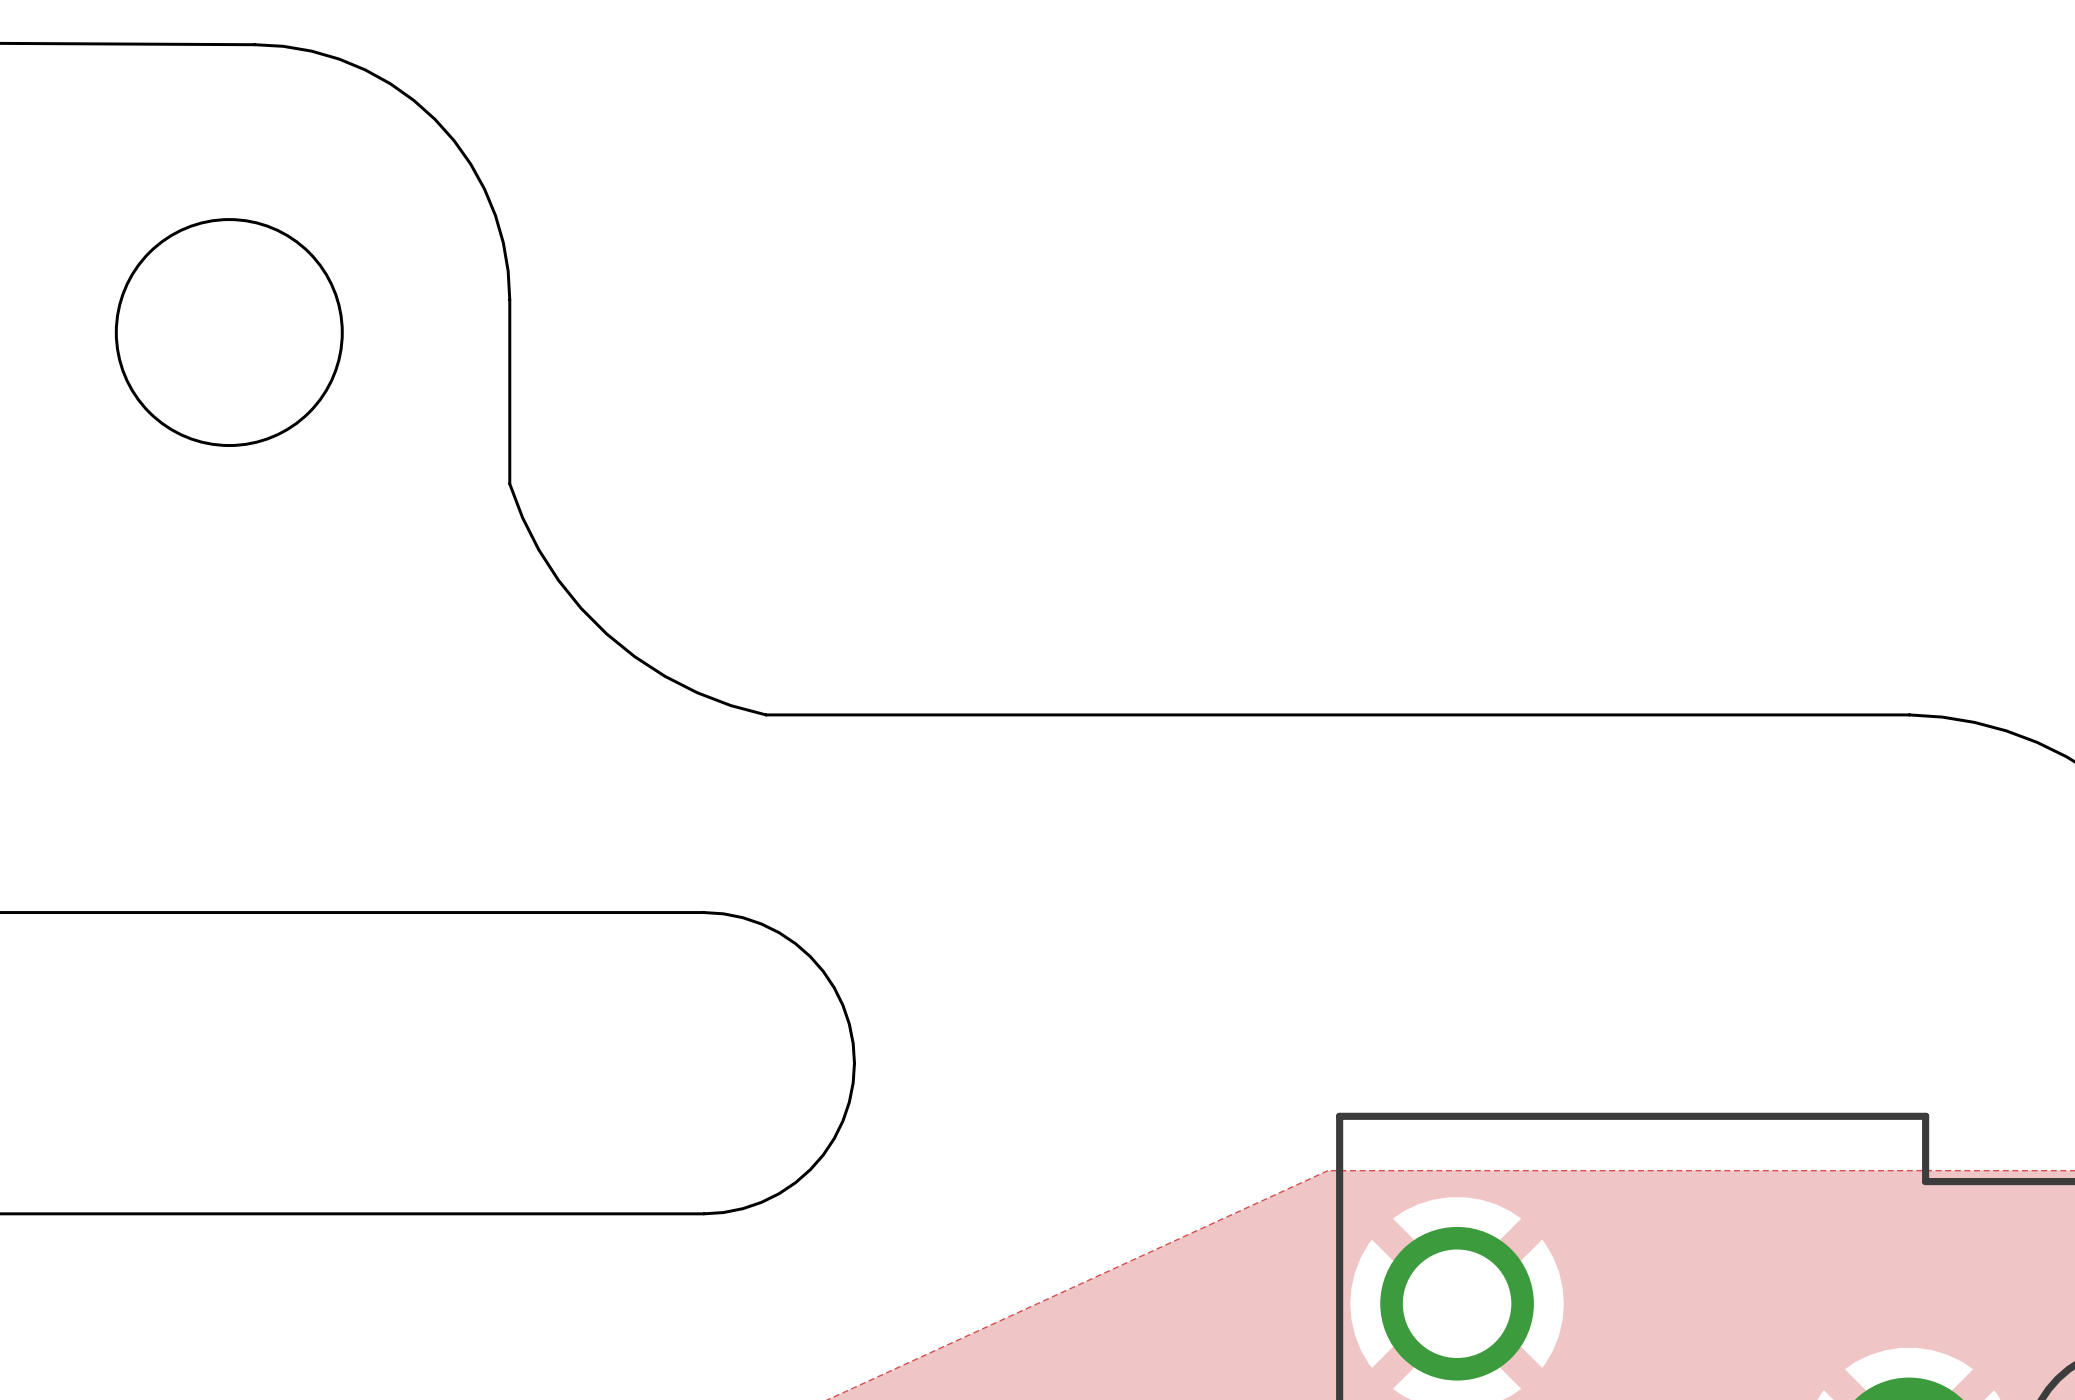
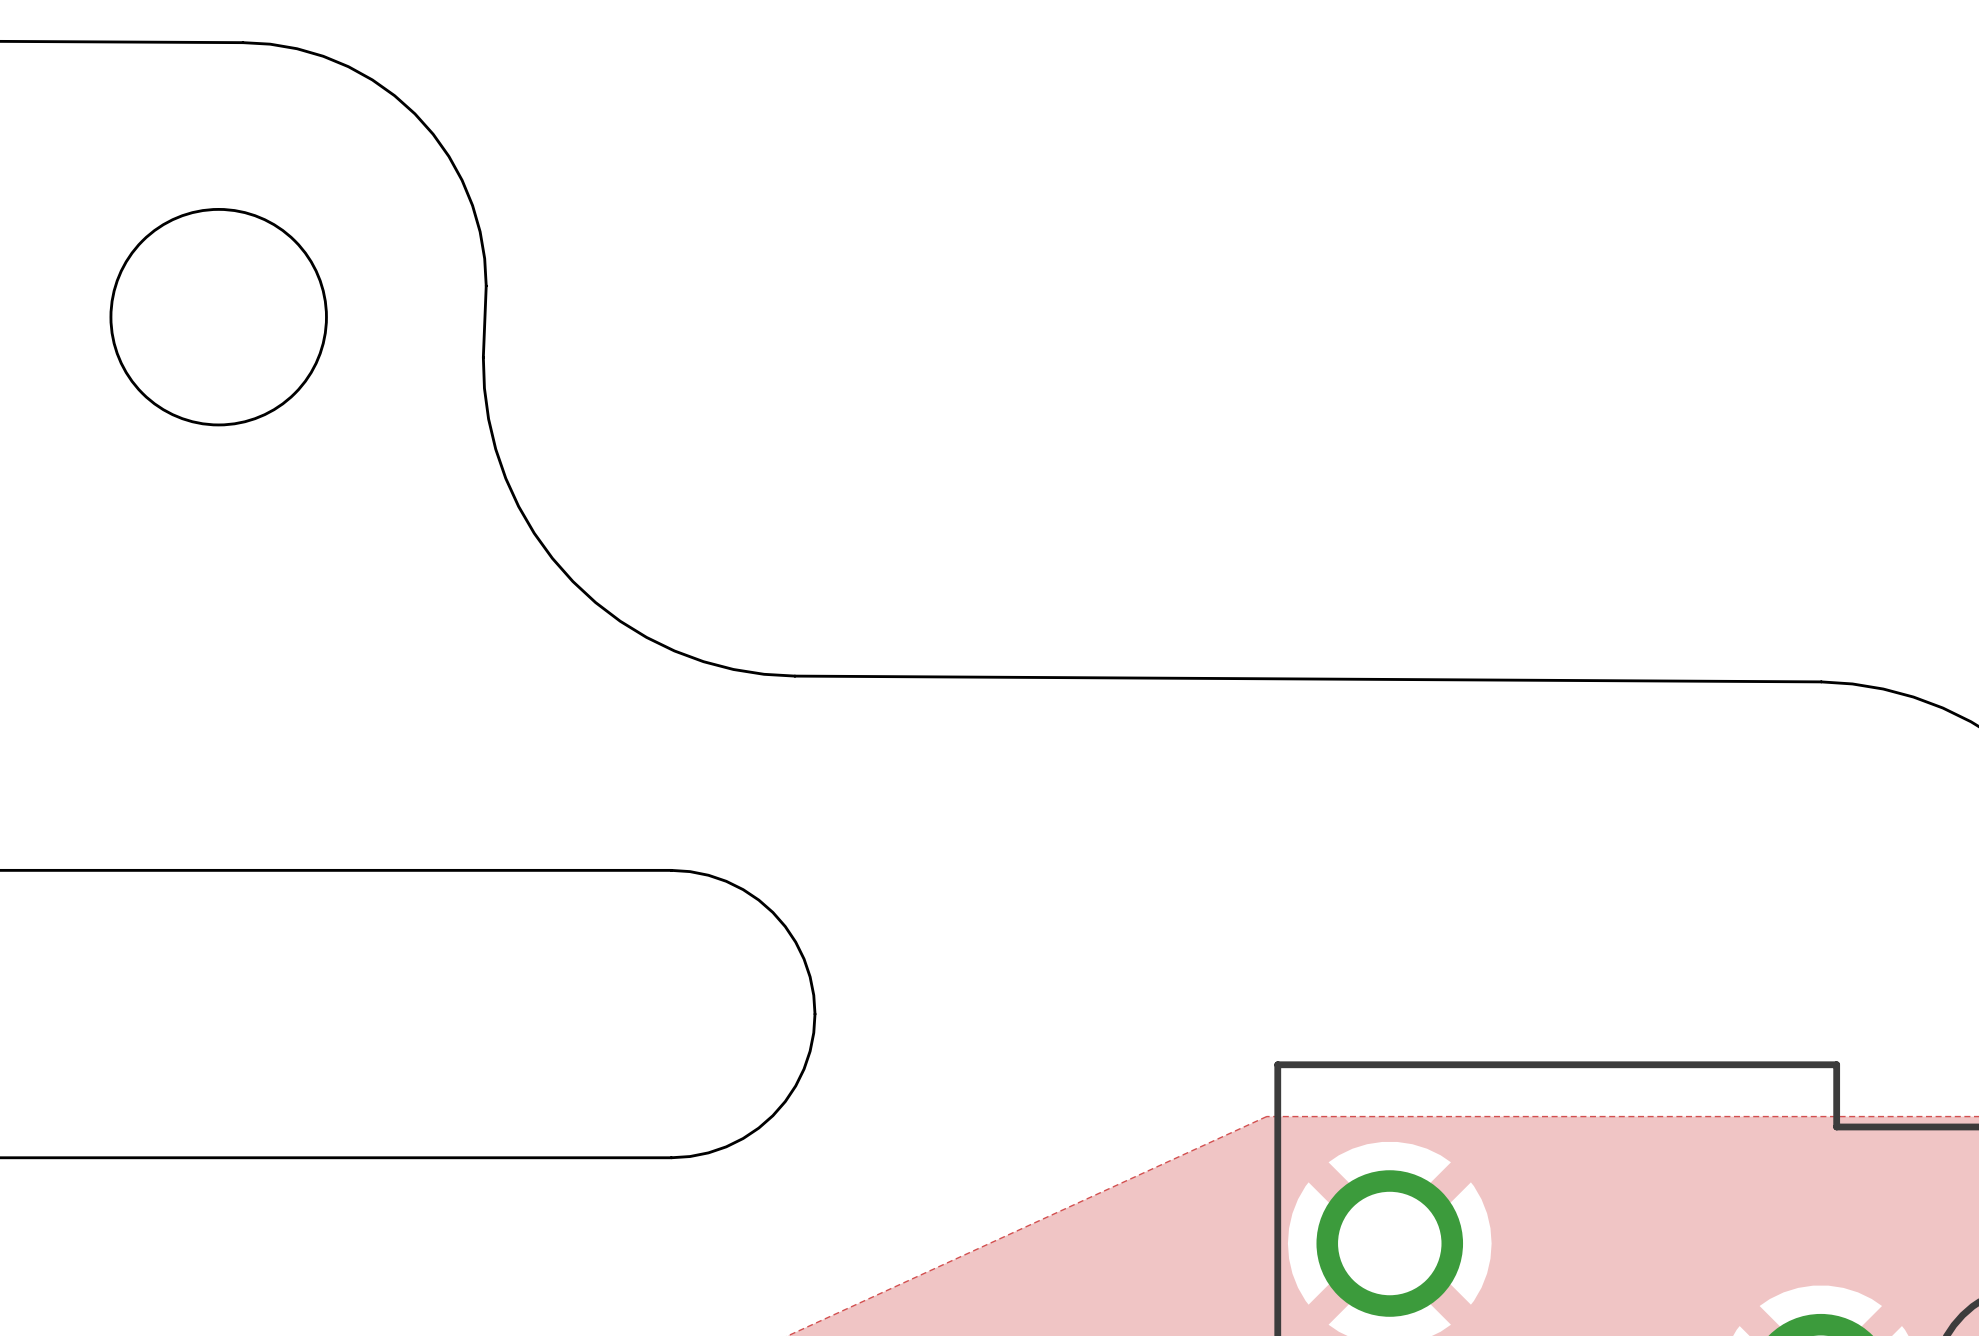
board edge: (509, 299) (509, 483) (522, 517) (538, 549) (558, 580) (581, 608) (606, 633) (634, 656) (665, 676) (697, 692) (731, 705) (765, 714) (1909, 714) -> (486, 285) (483, 357) (484, 388) (488, 419) (495, 449) (505, 478) (518, 506) (534, 533) (552, 558) (572, 581) (595, 602) (620, 621) (646, 637) (674, 650) (703, 661) (733, 669) (764, 674) (794, 676) (1821, 681)

